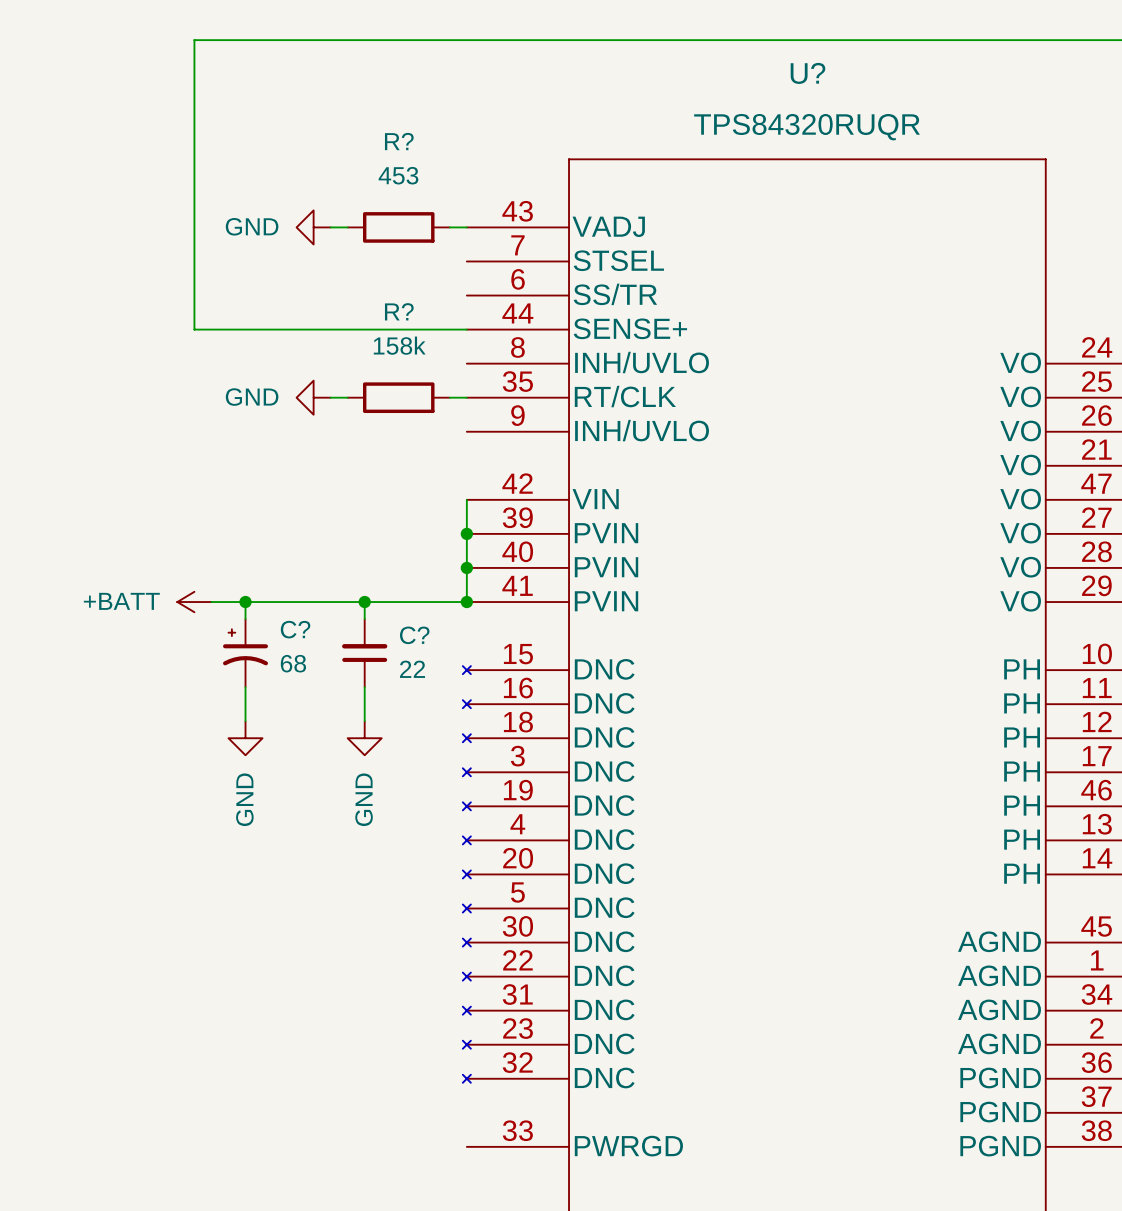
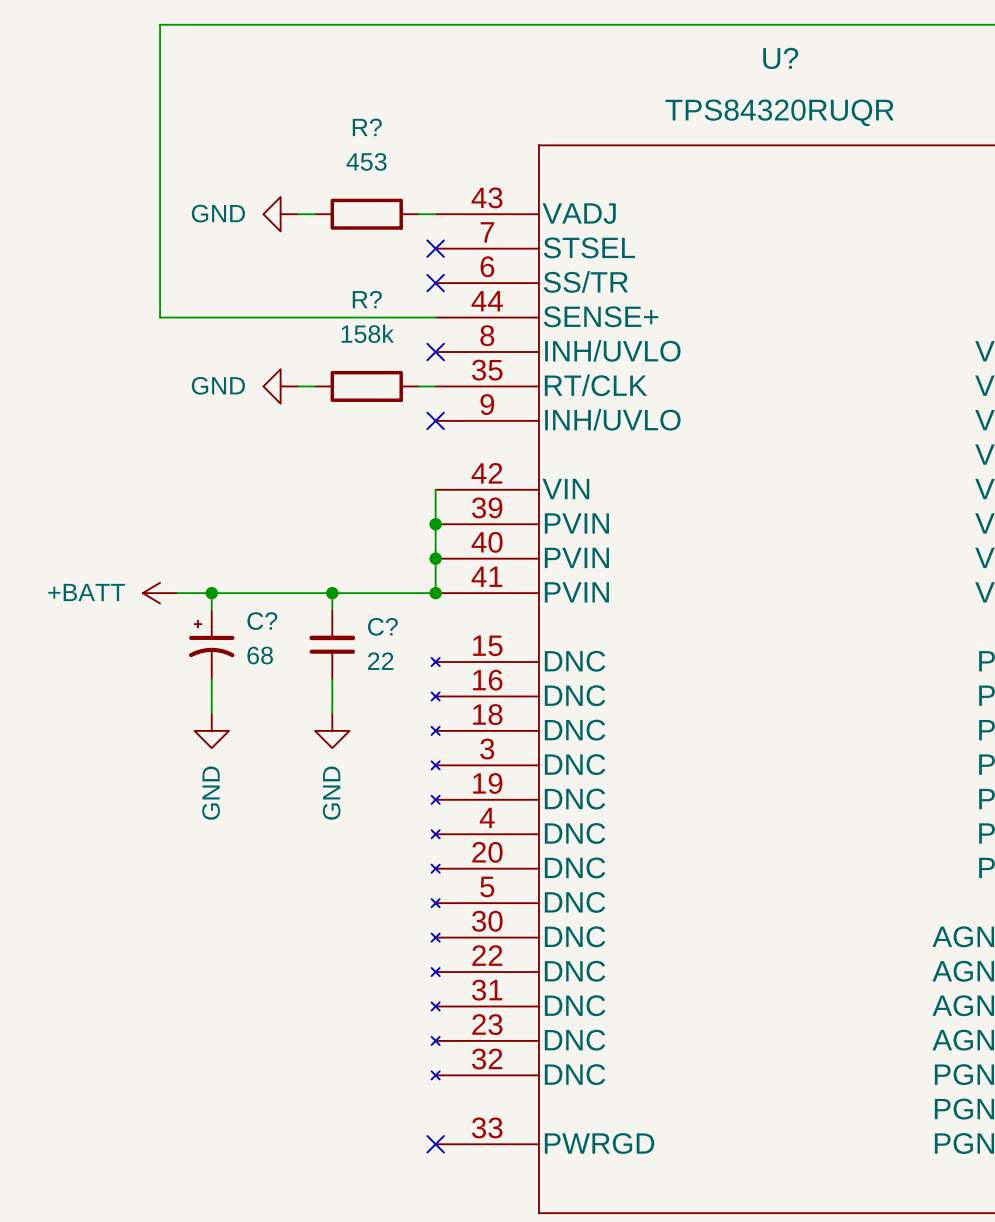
no-connect mark: none -> (435, 248)
no-connect mark: none -> (435, 283)
no-connect mark: none -> (435, 352)
no-connect mark: none -> (435, 420)
no-connect mark: none -> (435, 1144)

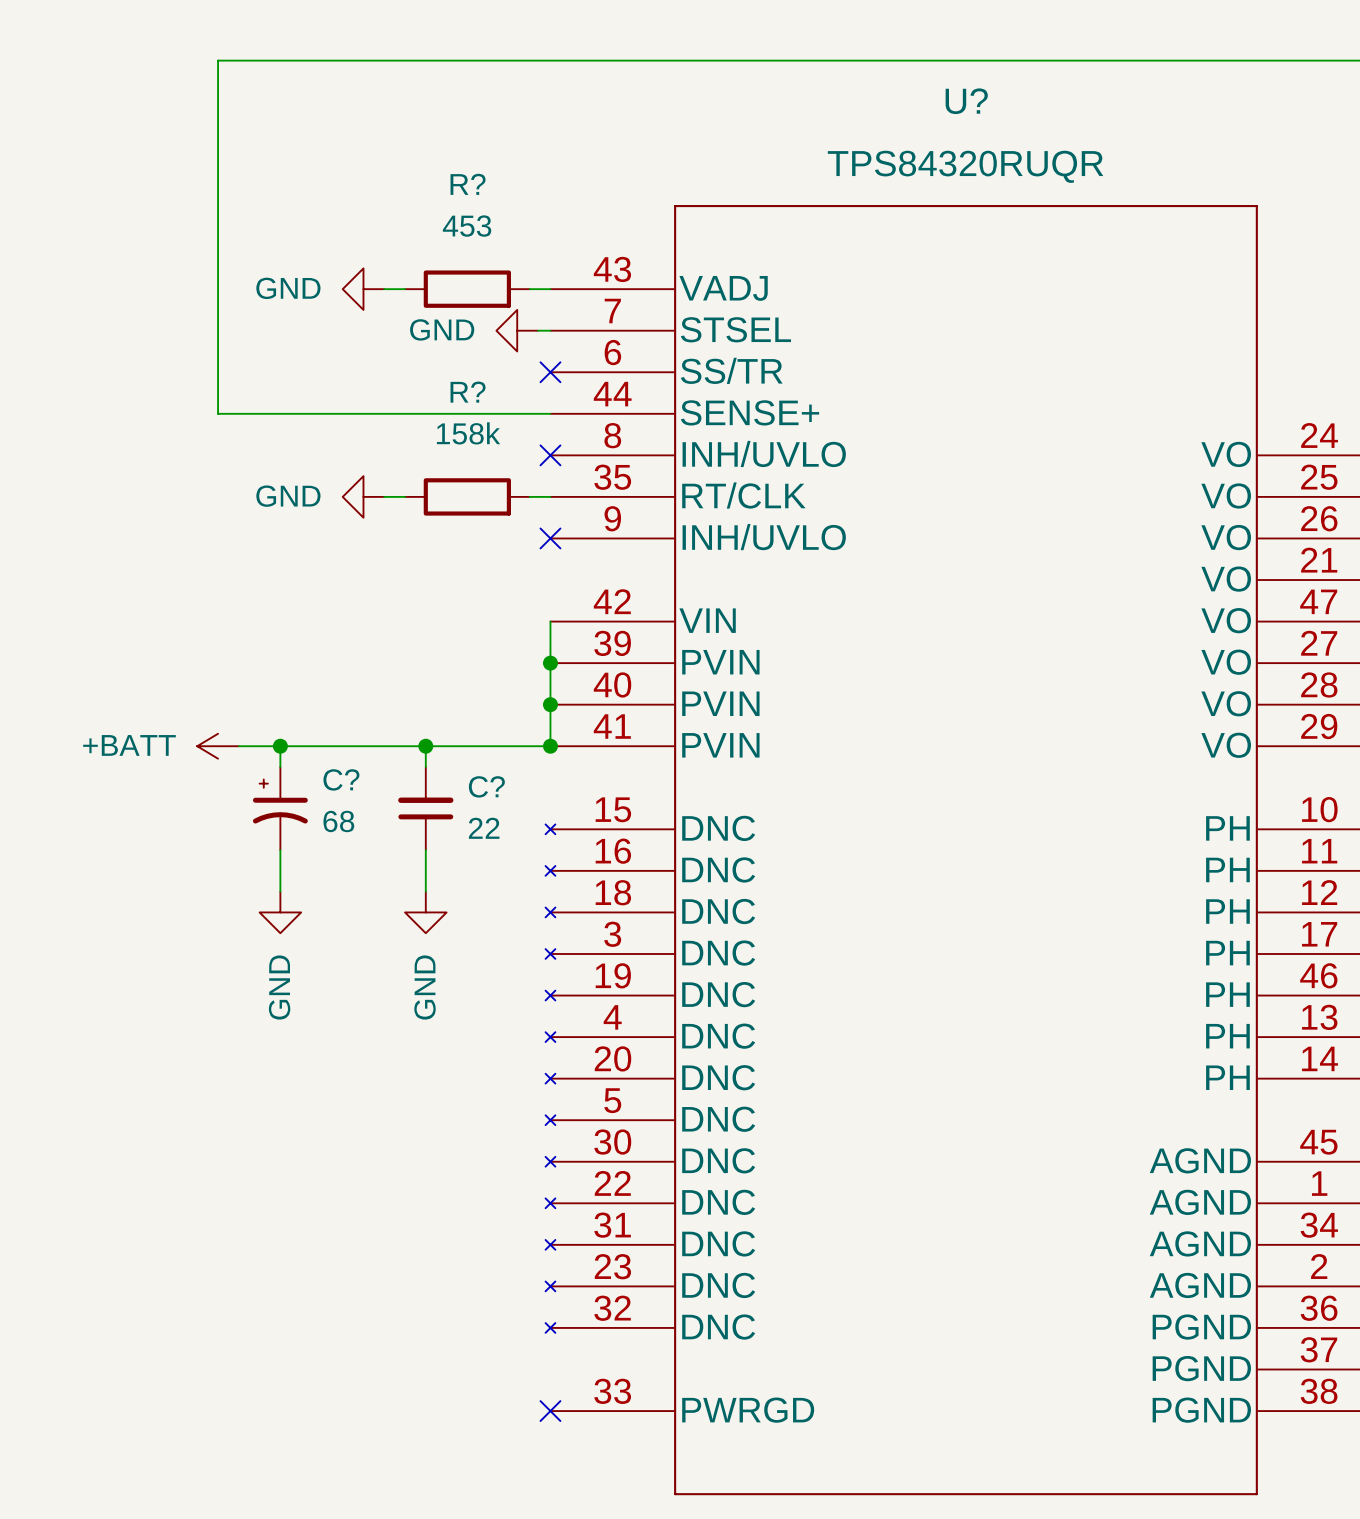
power symbol: none -> GND (517, 330)
wire: none -> (538, 330) (550, 330)
no-connect mark: (435, 248) -> none

